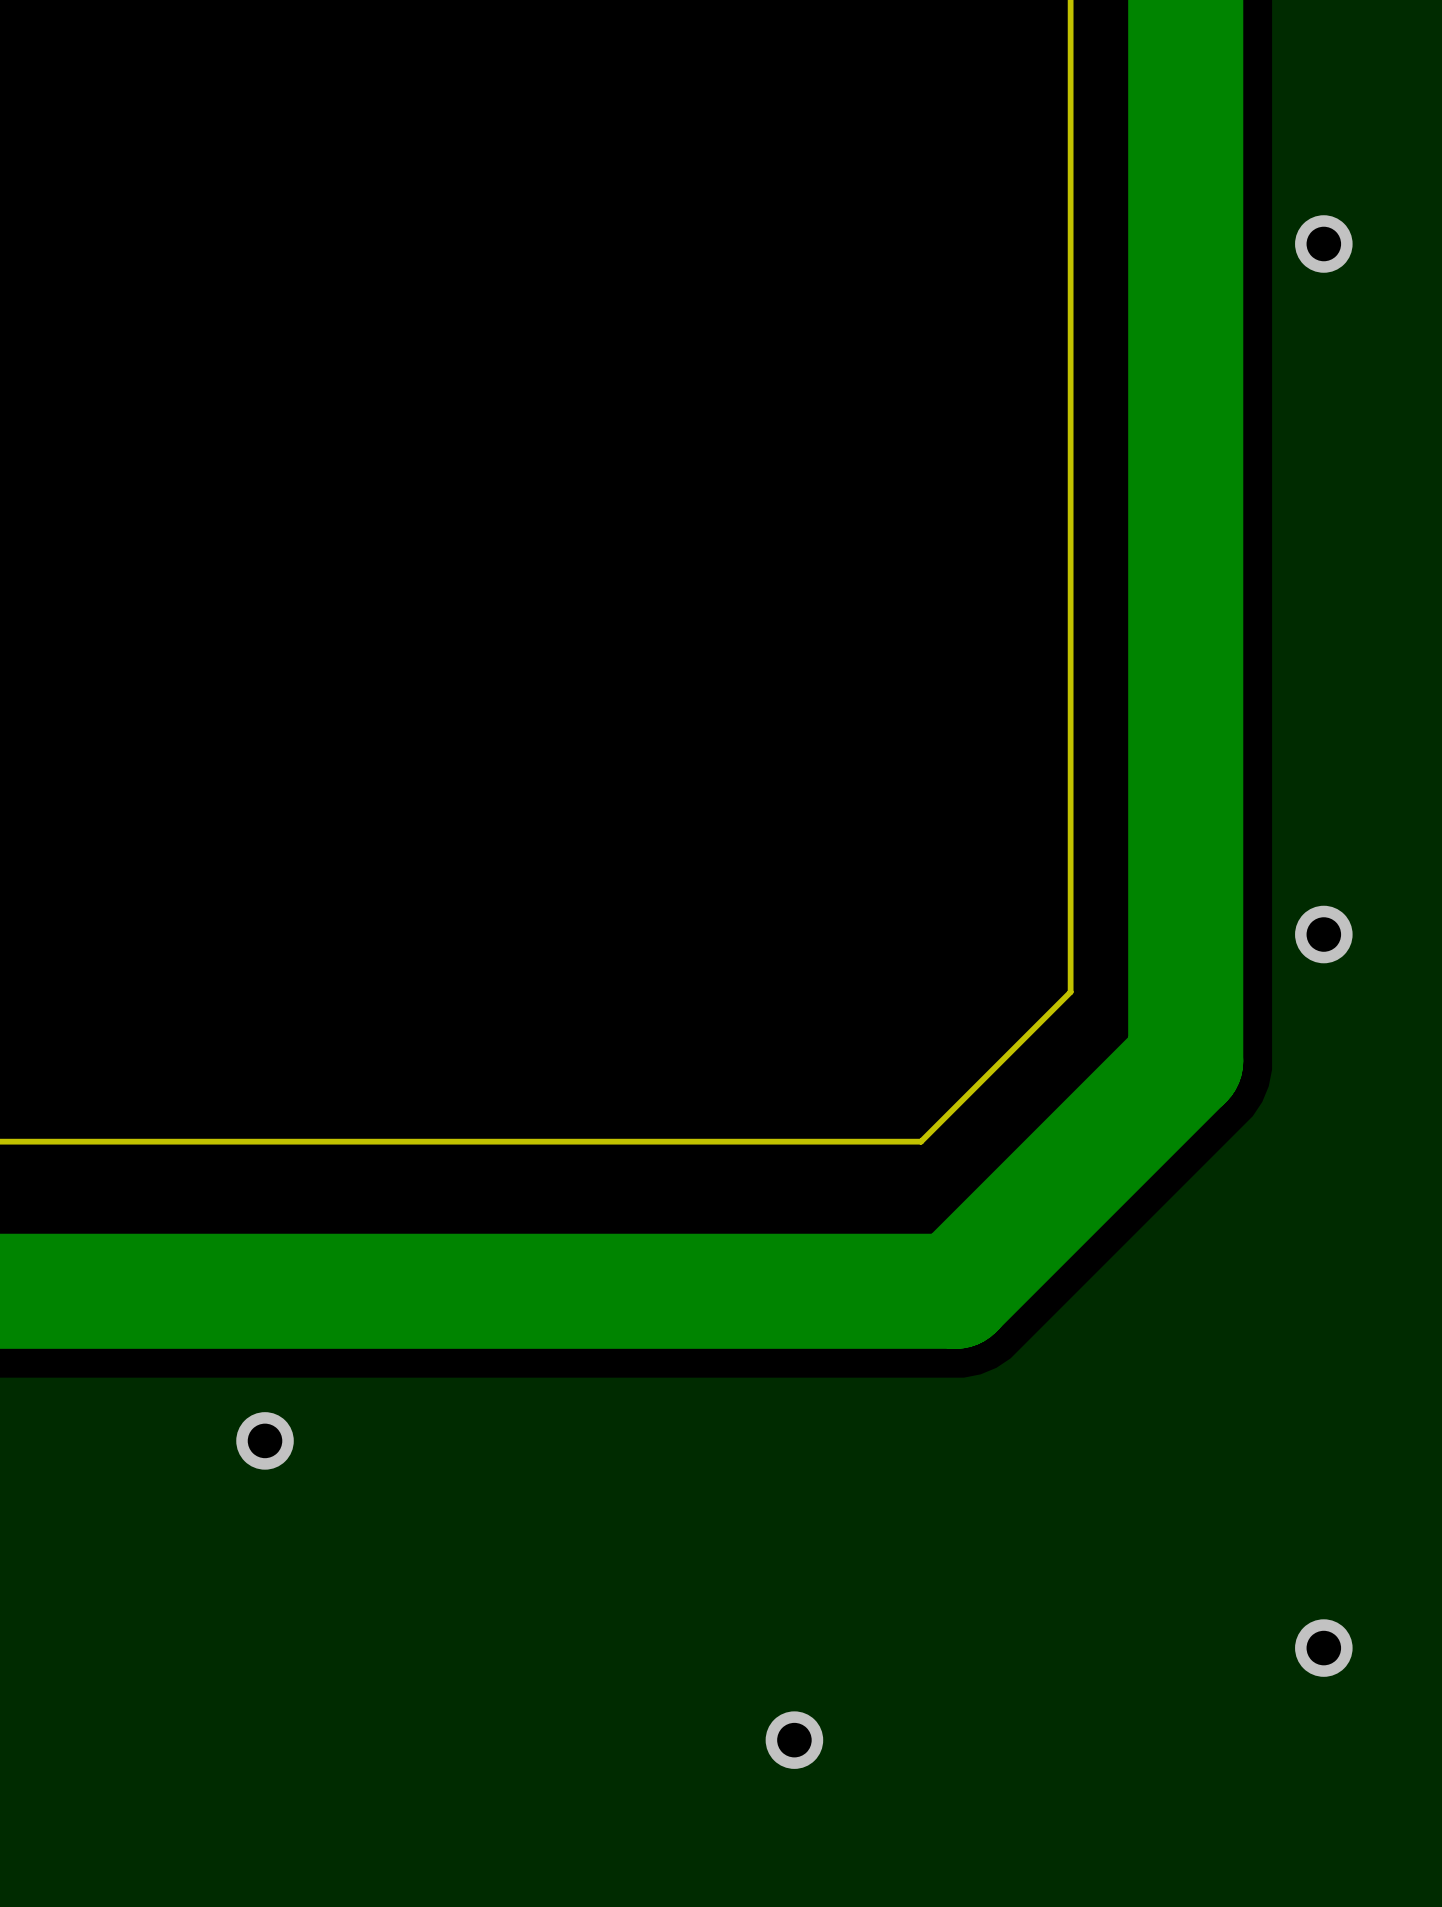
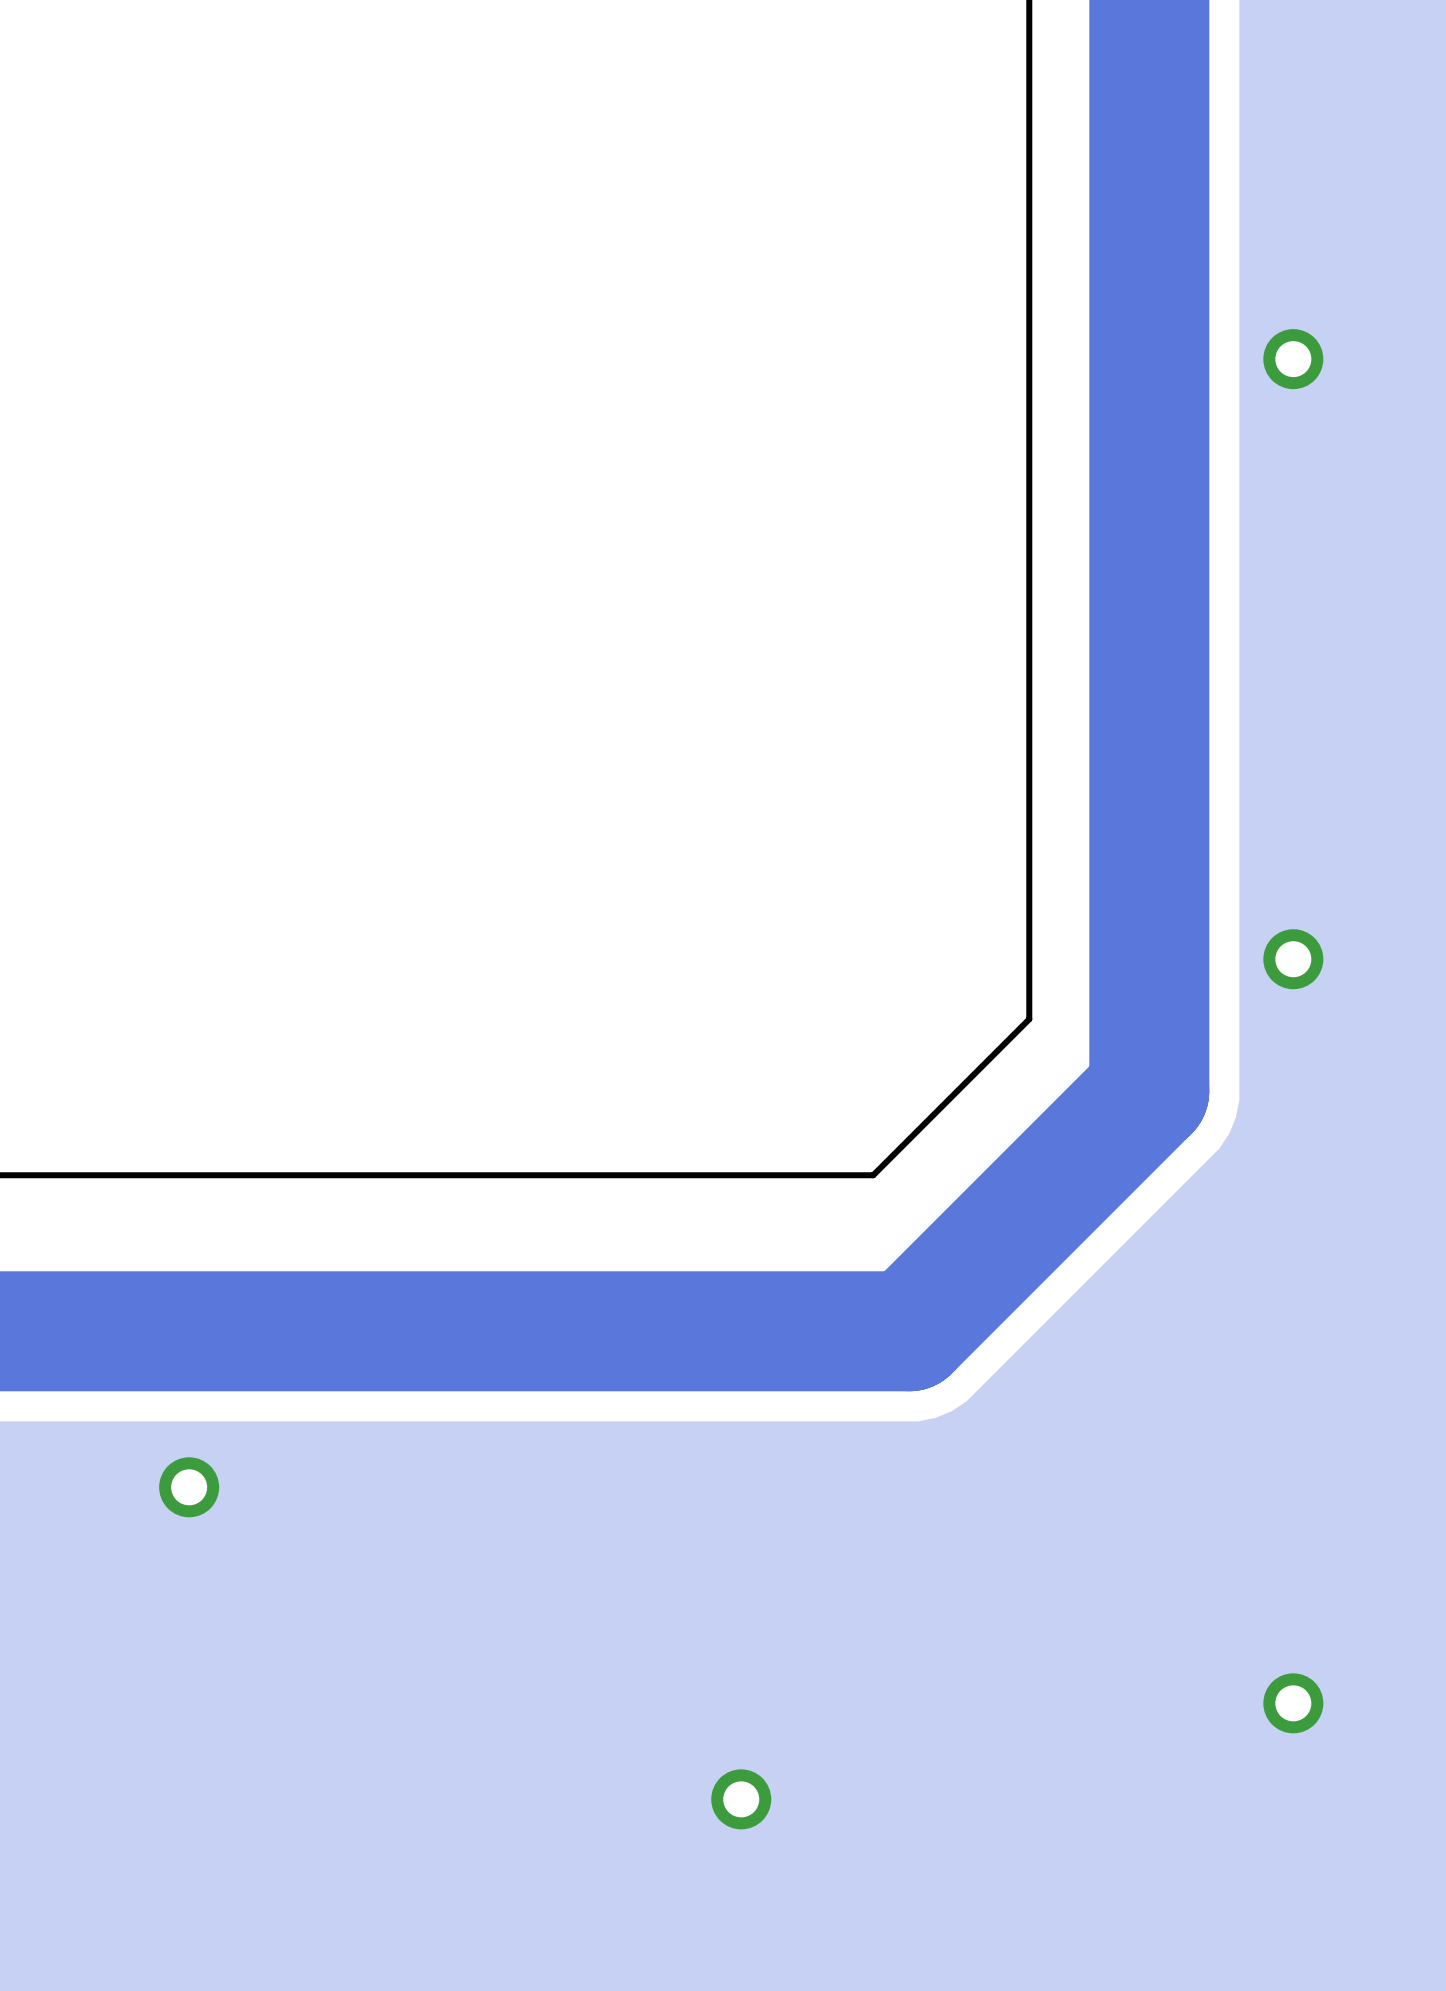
via position: (1323, 244) -> (1293, 359)

